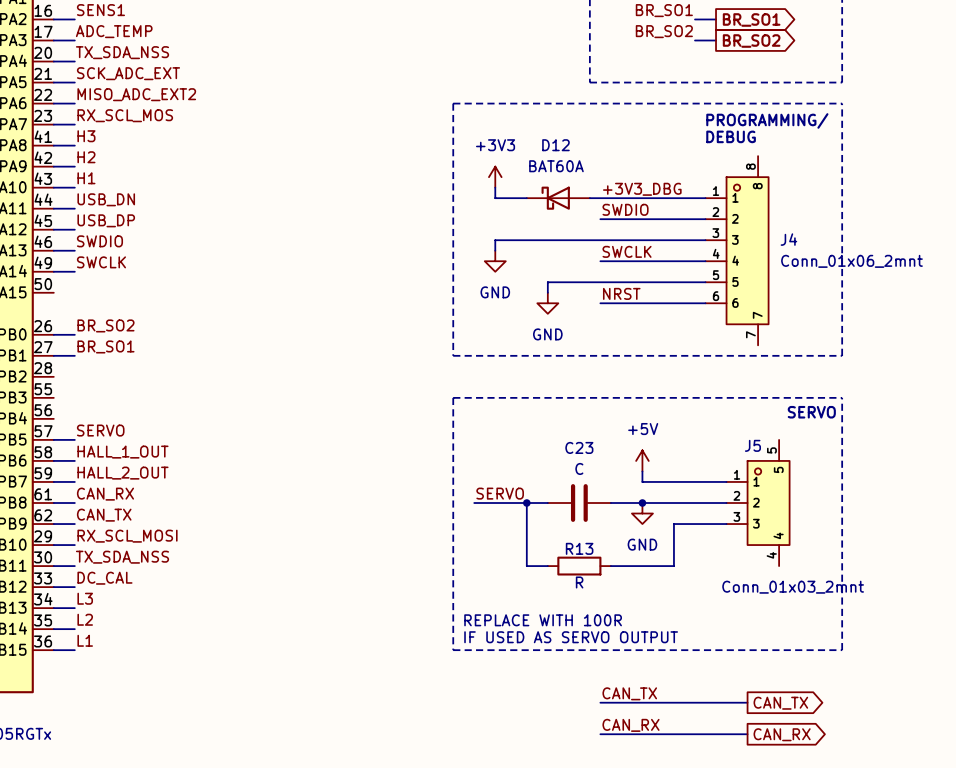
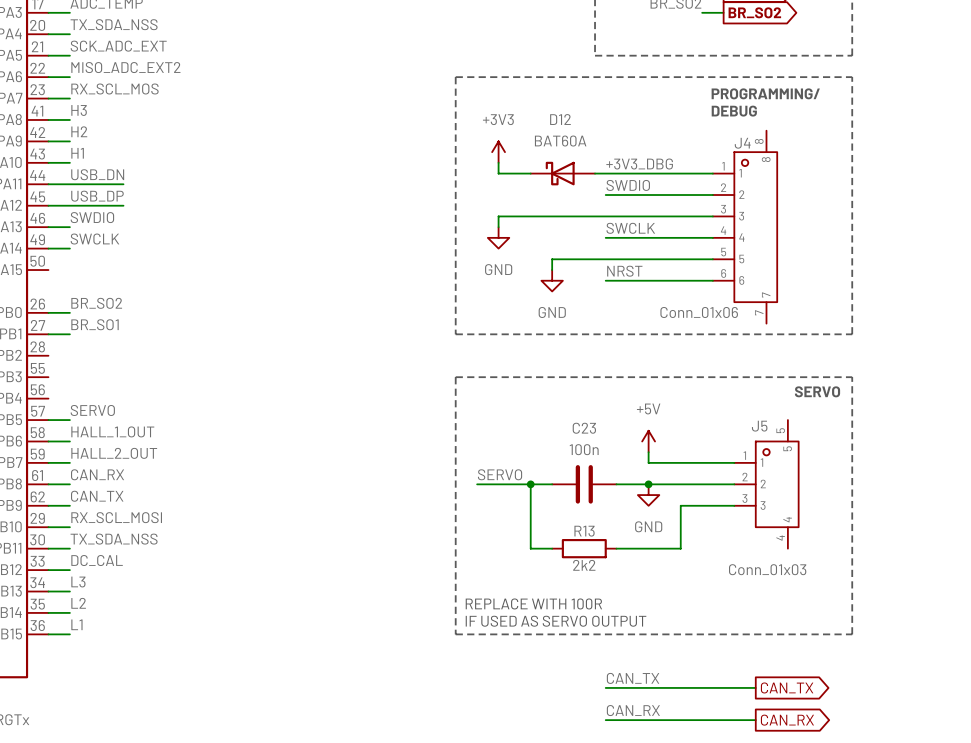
wire: none -> (69, 184) (123, 184)
wire: none -> (69, 205) (123, 205)
J4 name position: J4 (788, 239) -> J4 (742, 143)
J4 value: Conn_01x06_2mnt (851, 261) -> Conn_01x06 (699, 312)
C23 value: C (579, 468) -> 100n (584, 449)
R13 value: R (579, 582) -> 2k2 (584, 565)
J5 value: Conn_01x03_2mnt (793, 587) -> Conn_01x03 (767, 569)

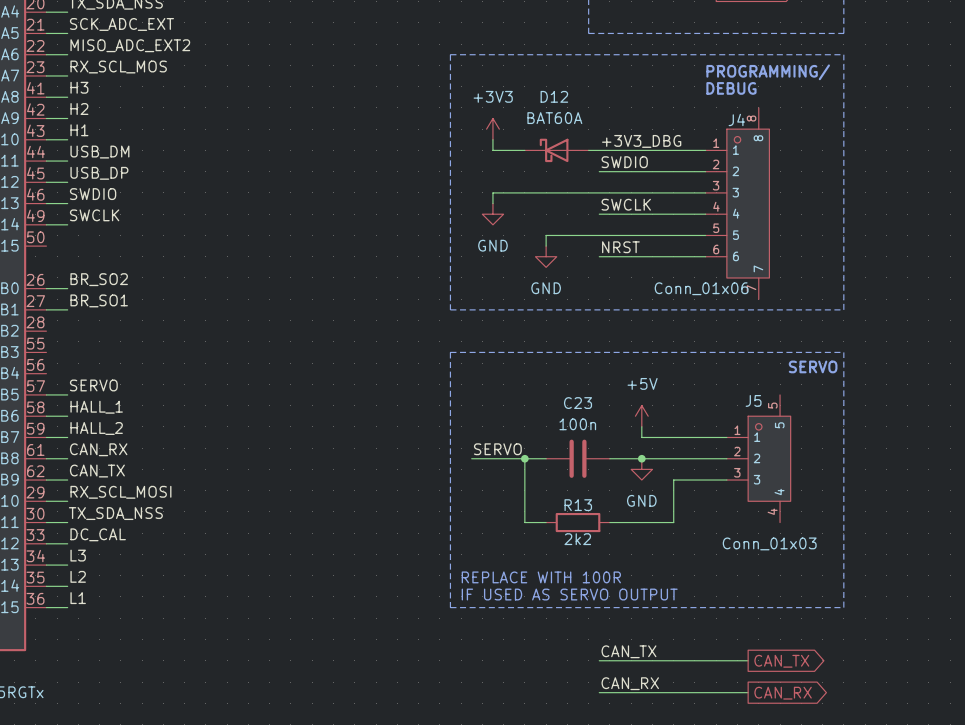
label: USB_DN (97, 174) -> USB_DM (99, 152)
wire: (69, 184) (123, 184) -> none
wire: (69, 205) (123, 205) -> none
label: HALL_1_OUT (112, 431) -> HALL_1 (96, 407)
label: HALL_2_OUT (114, 453) -> HALL_2 (96, 428)

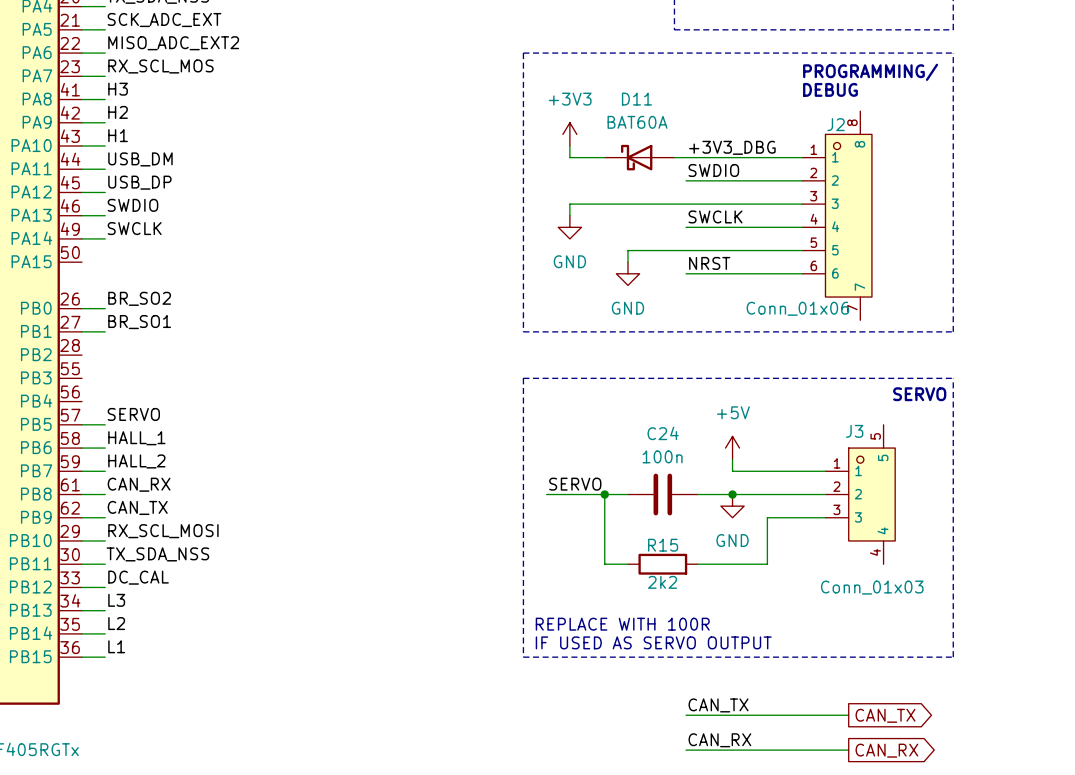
D12 name: D12 (554, 96) -> D11 (636, 99)
J4 name: J4 (736, 119) -> J2 (836, 124)
J5 name: J5 (753, 400) -> J3 (854, 431)
C23 name: C23 (578, 403) -> C24 (663, 433)
R13 name: R13 (578, 505) -> R15 (663, 545)

